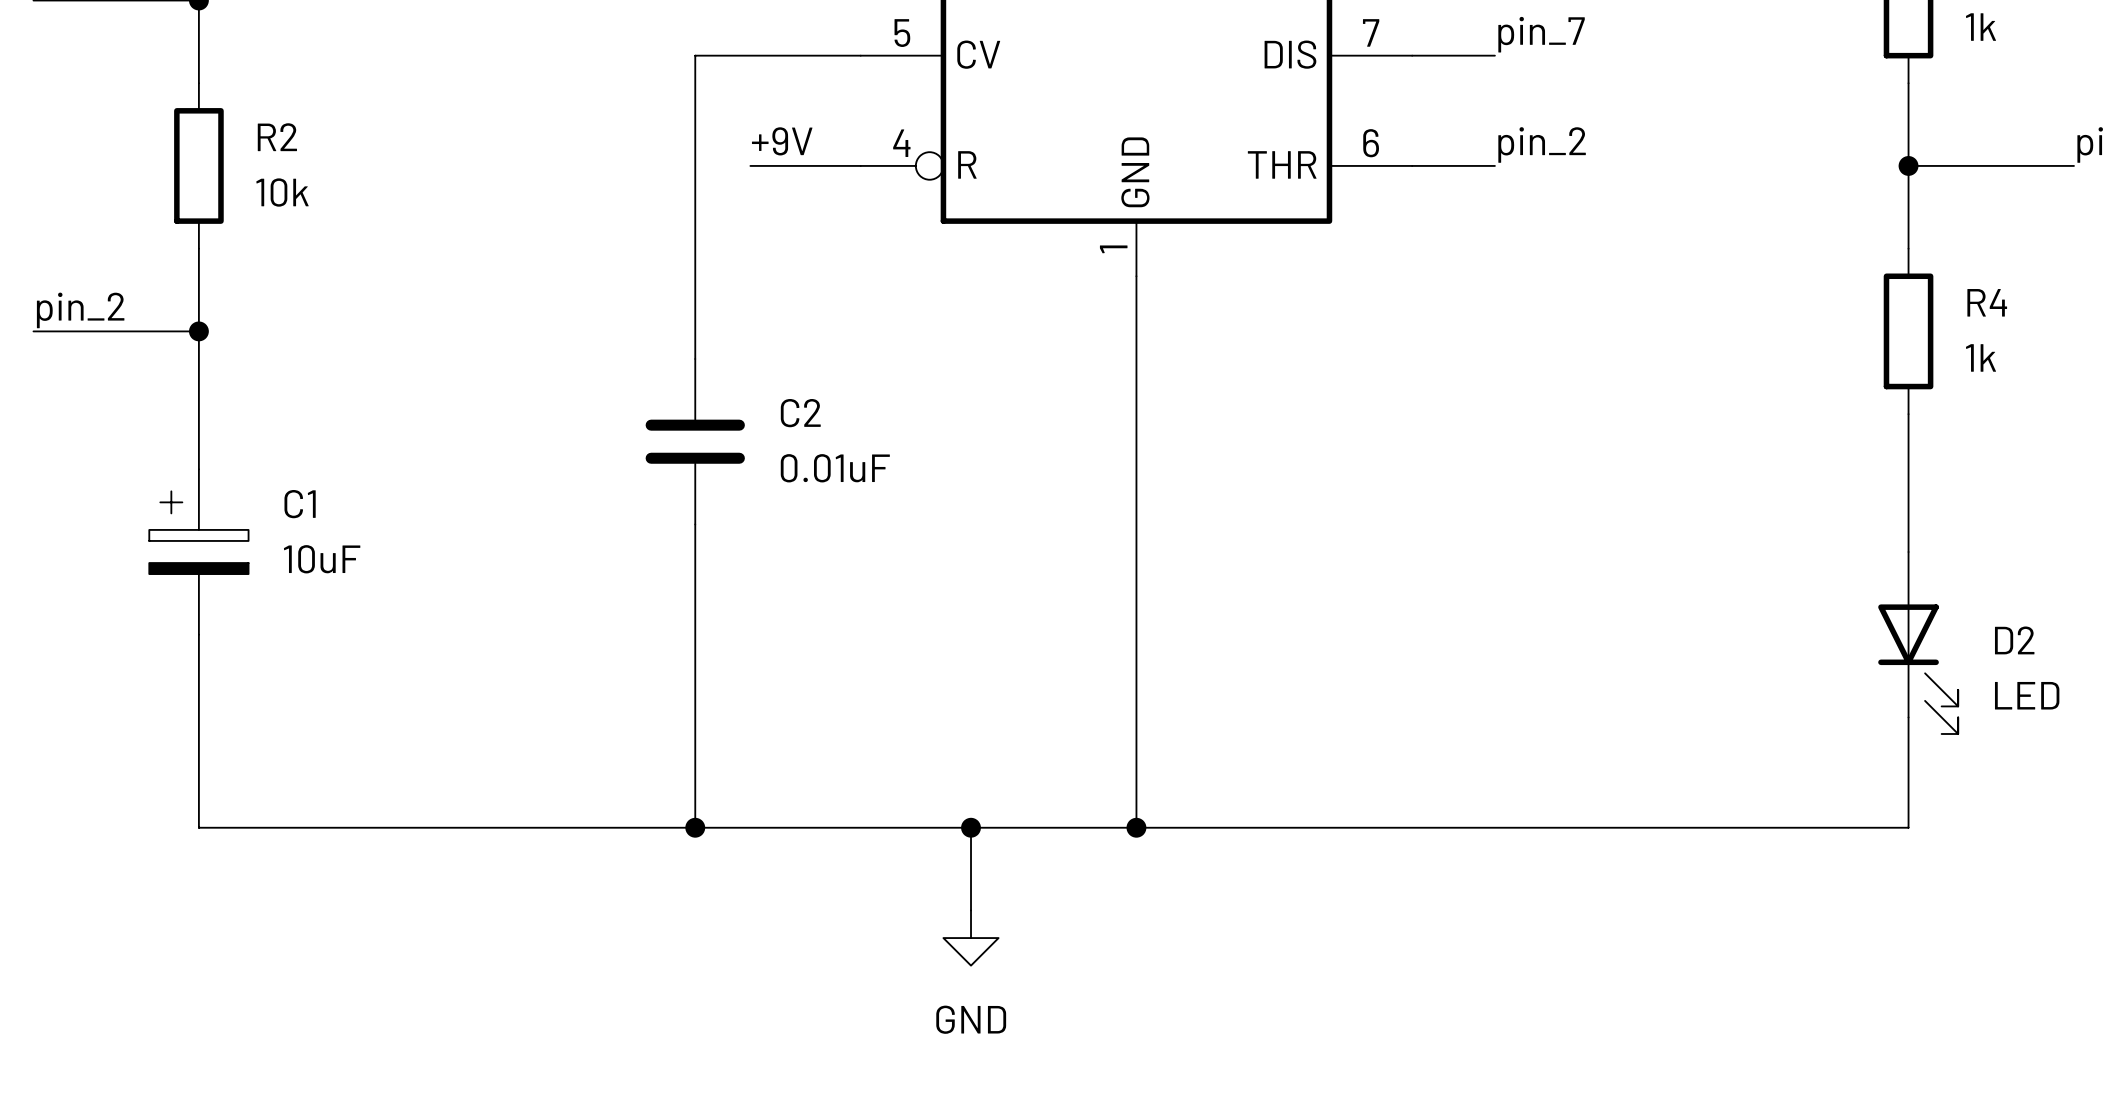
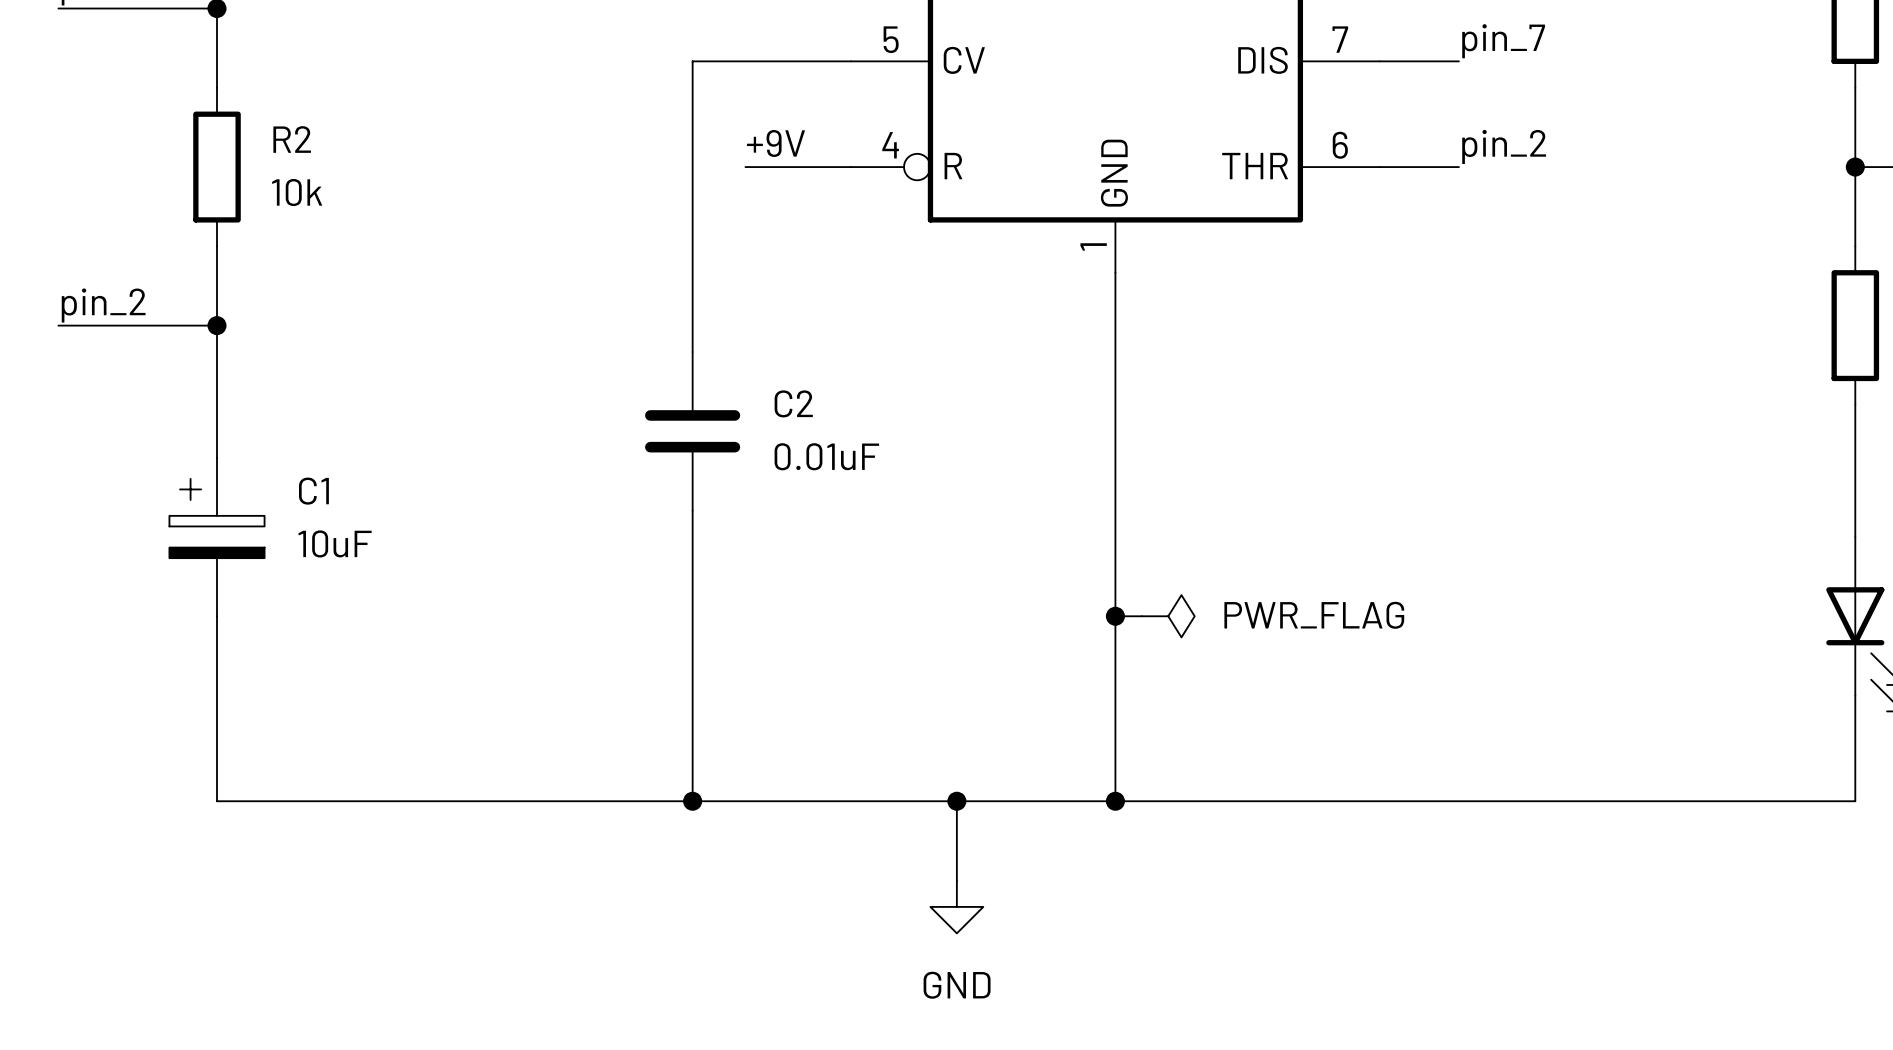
wire: none -> (1115, 616) (1141, 616)
junction: none -> (1115, 616)
power symbol: none -> PWR_FLAG (1168, 616)

